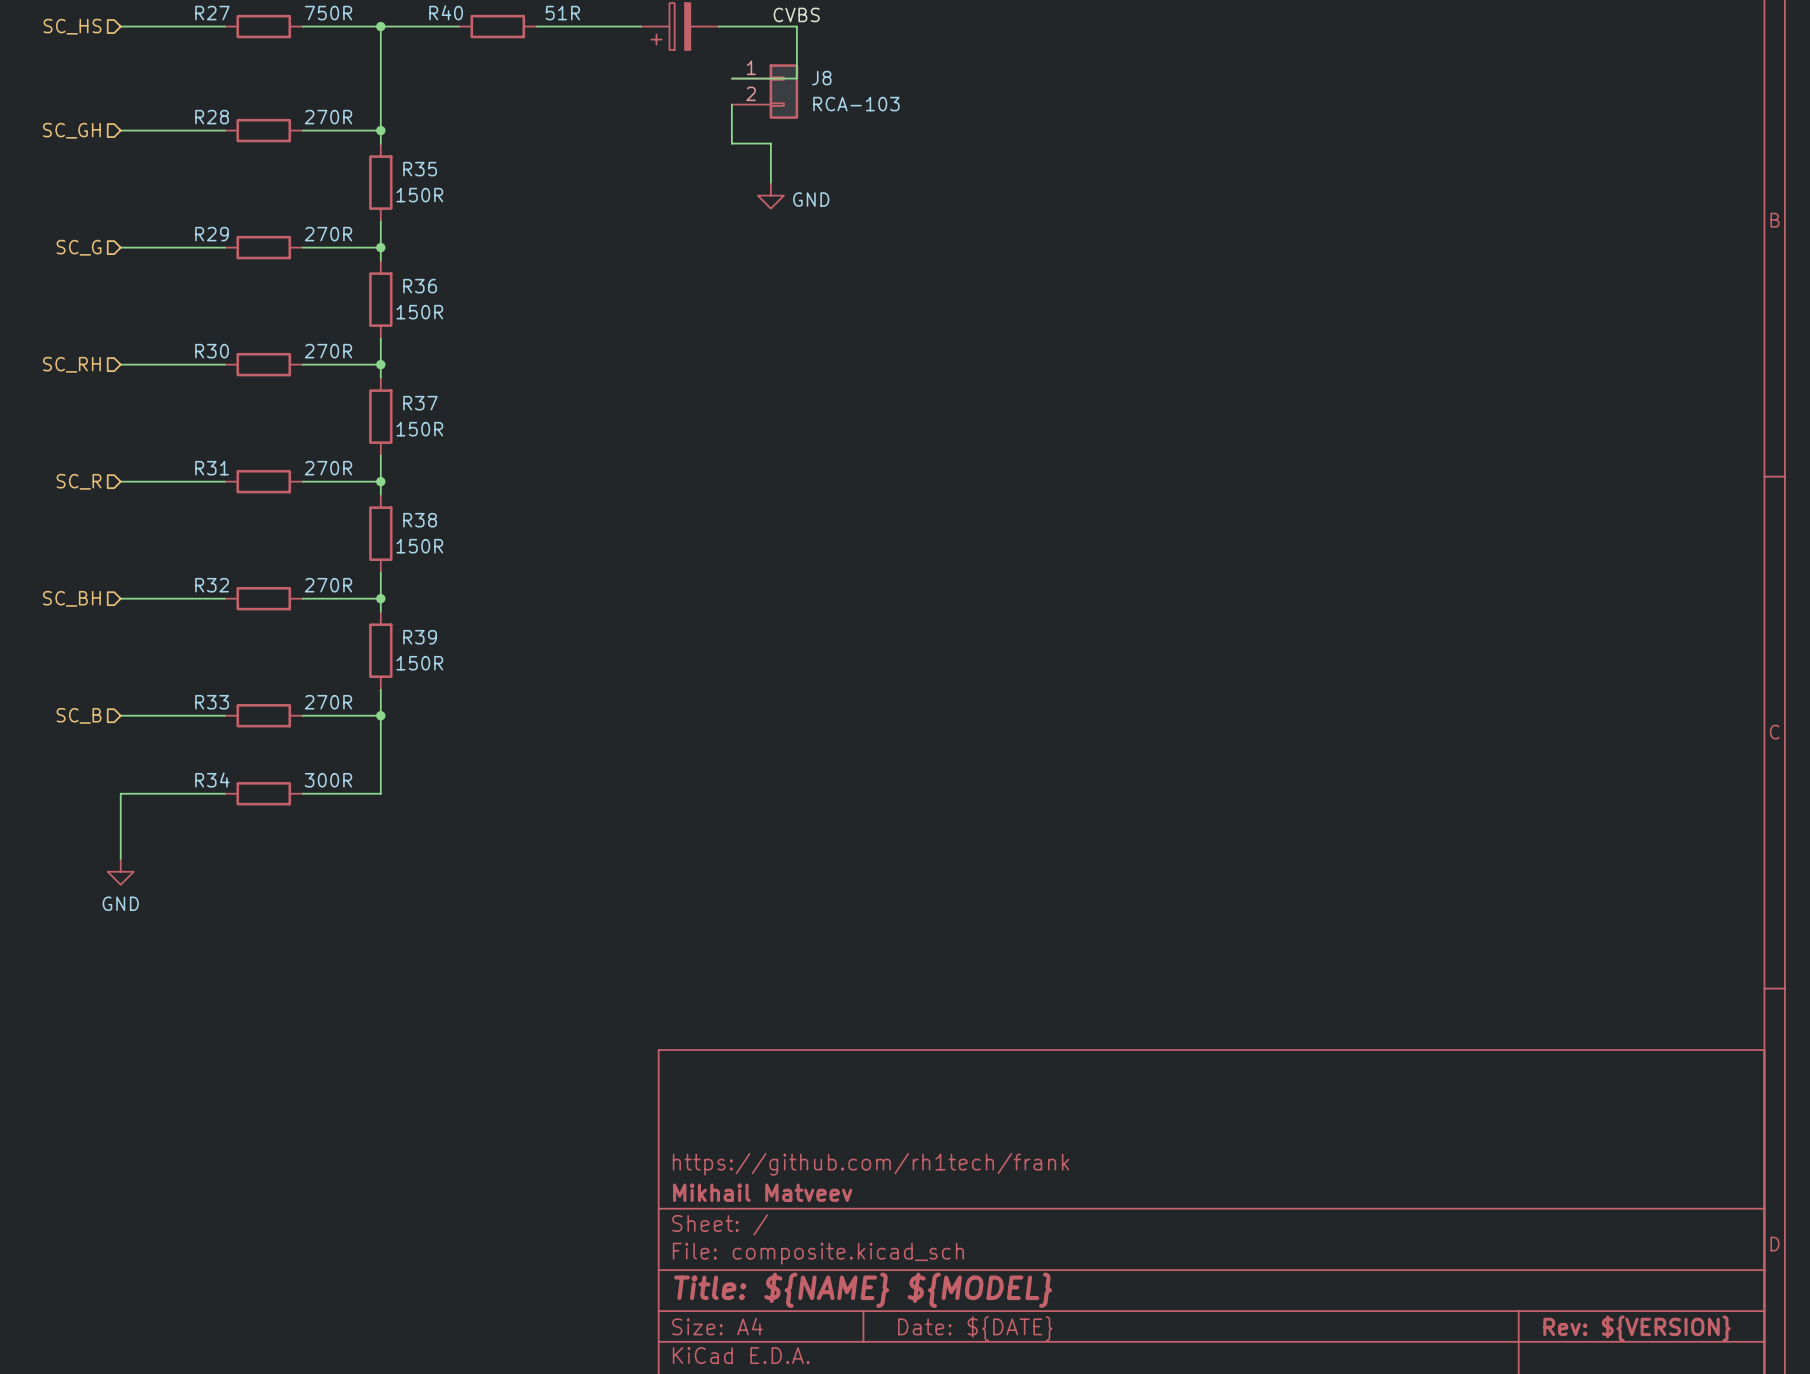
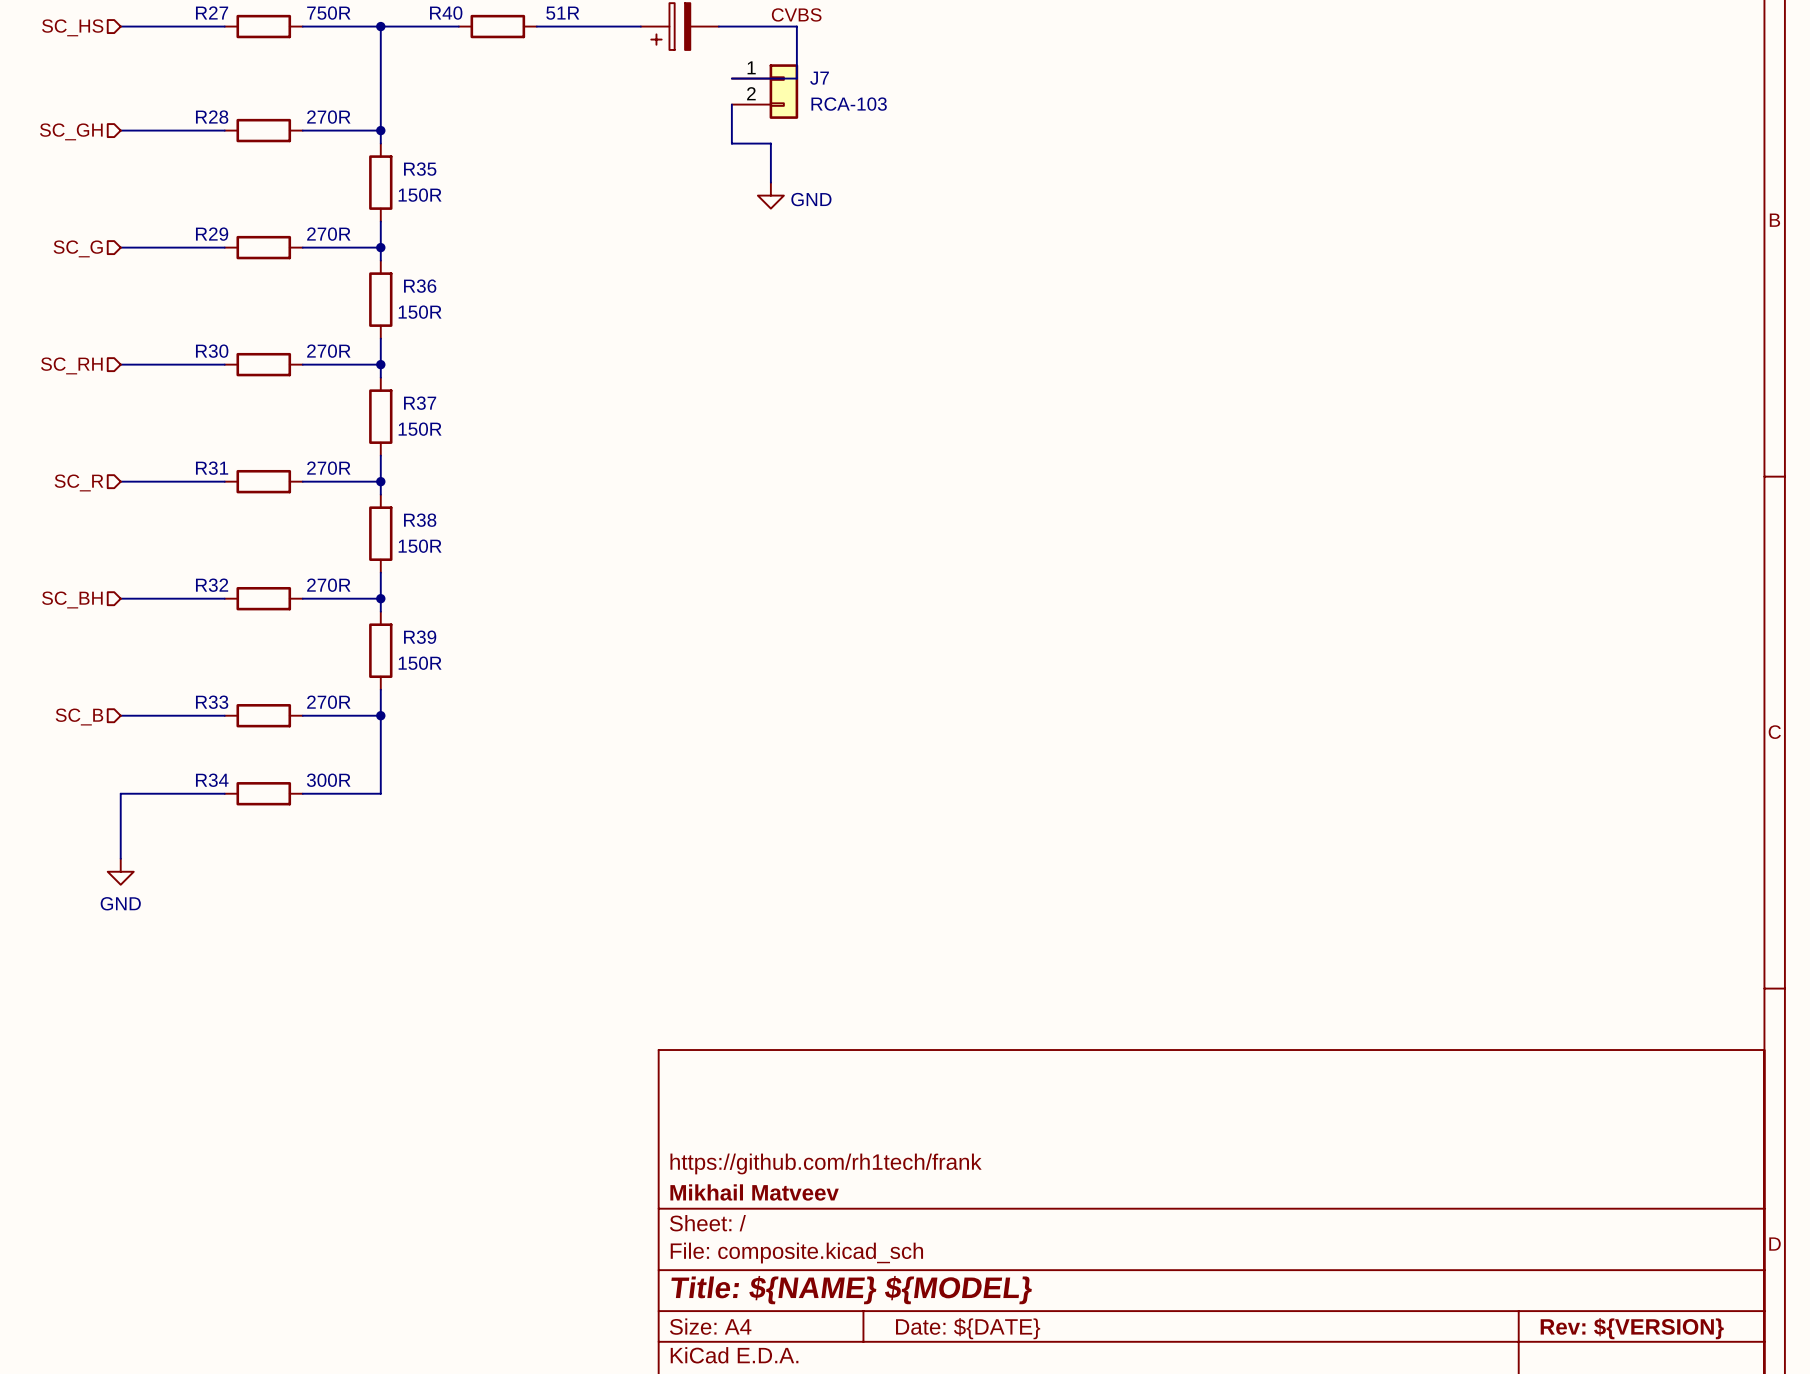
J8 name: J8 (821, 78) -> J7 (819, 78)

